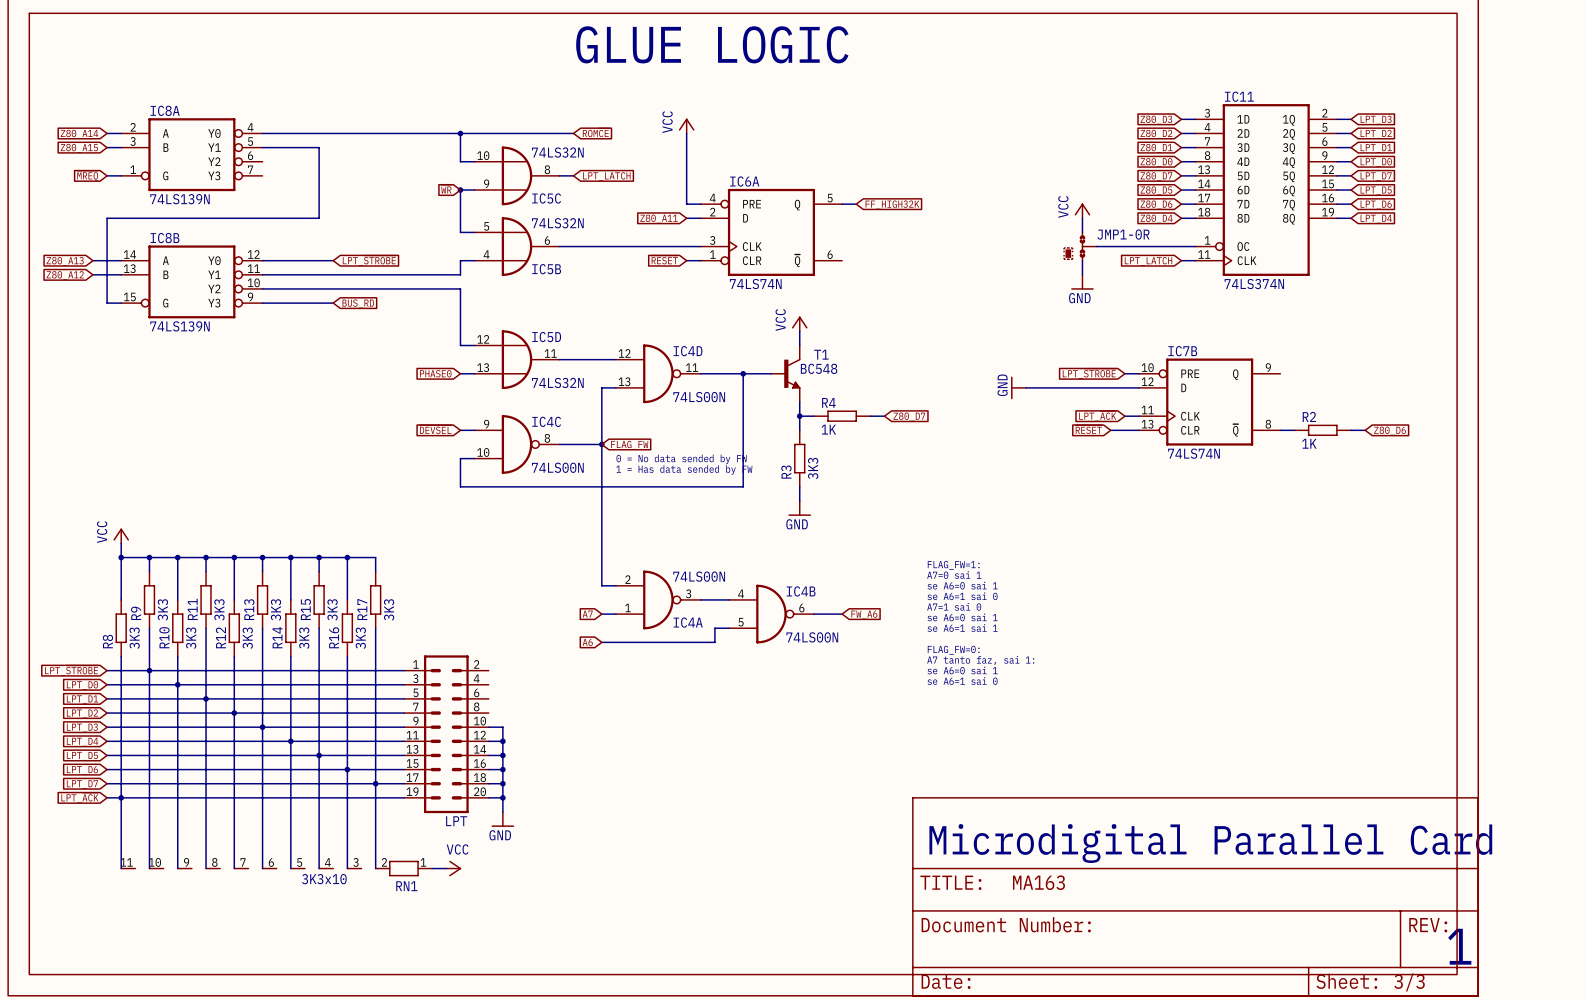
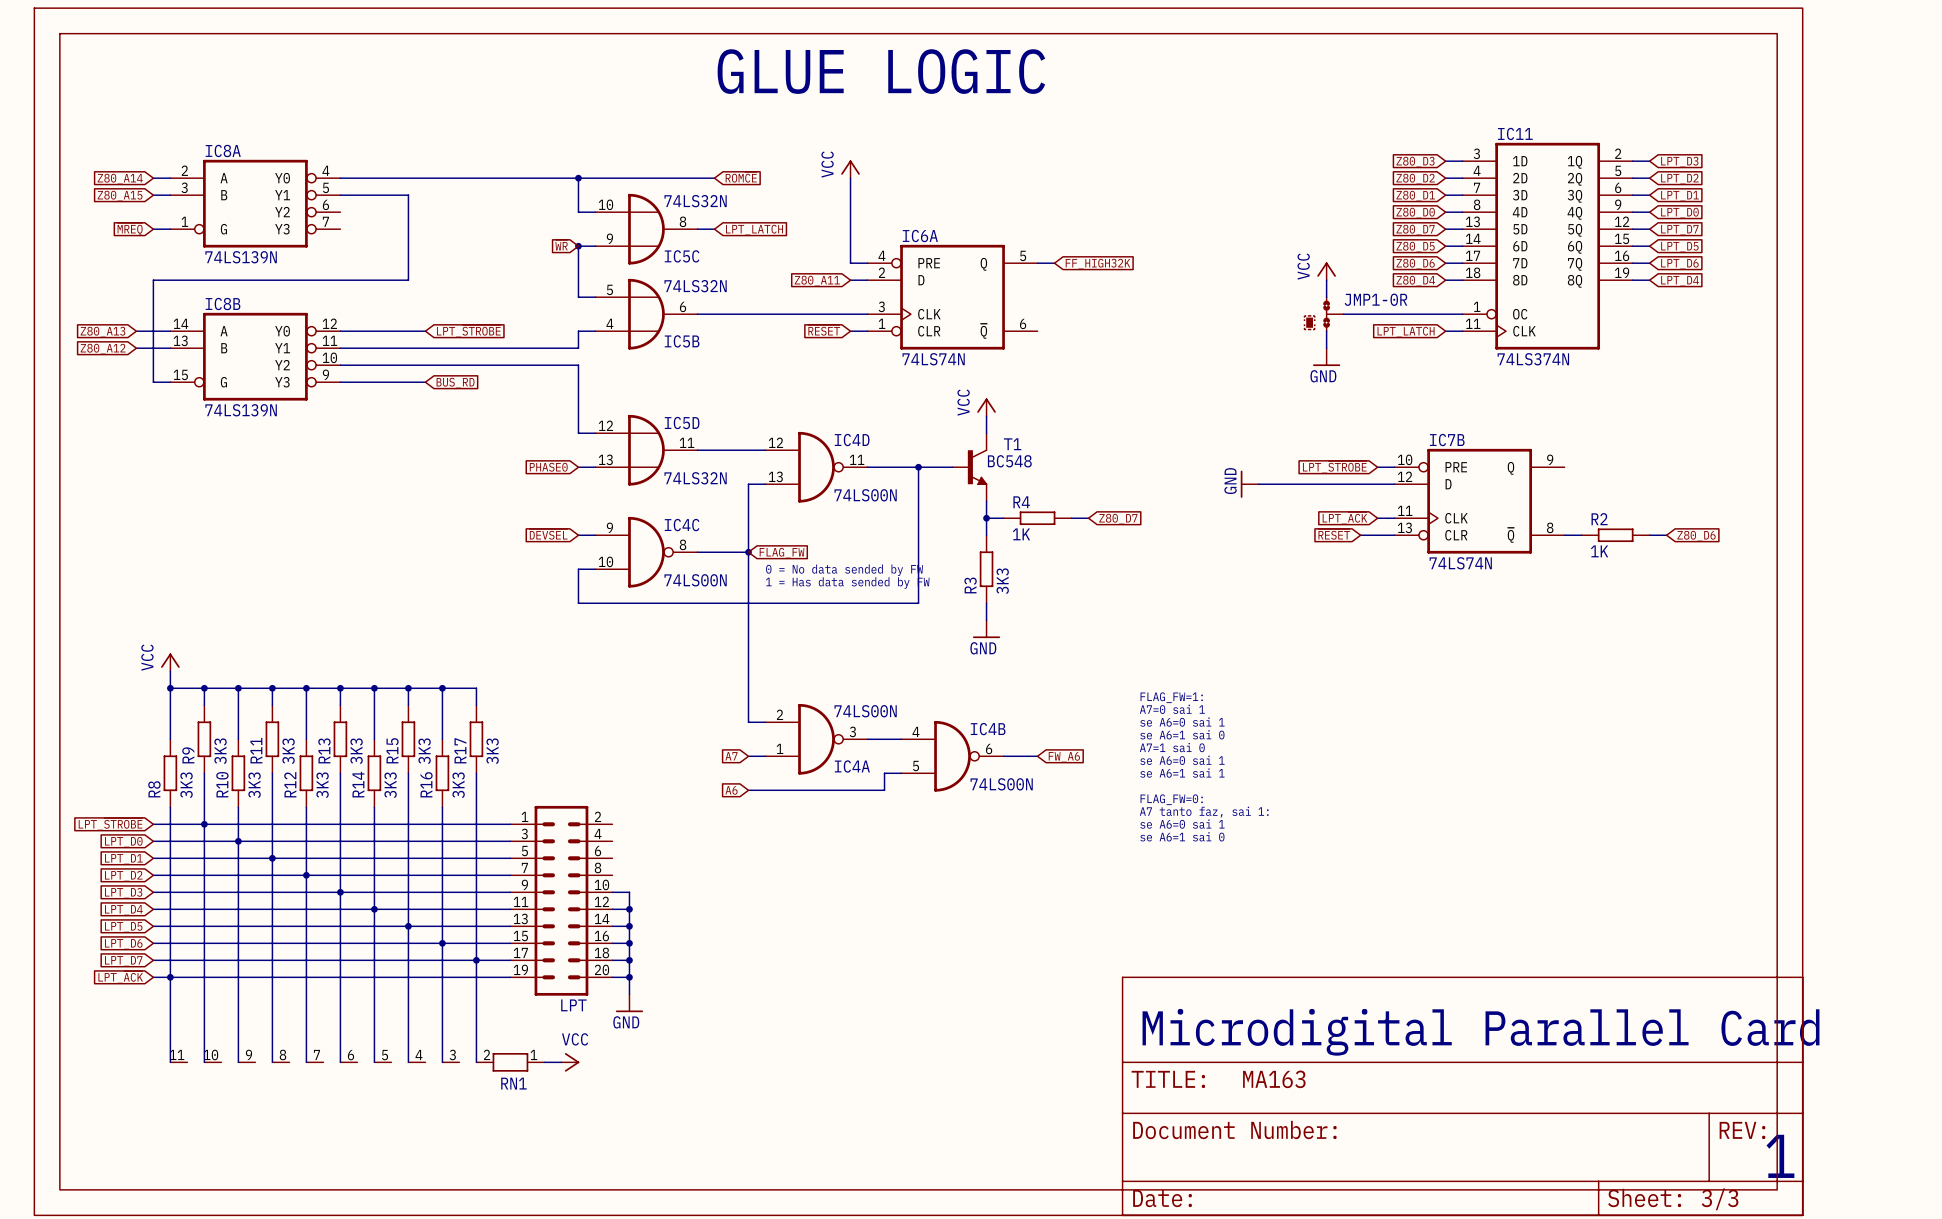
RN1 value: 3K3x10 (324, 879) -> none

